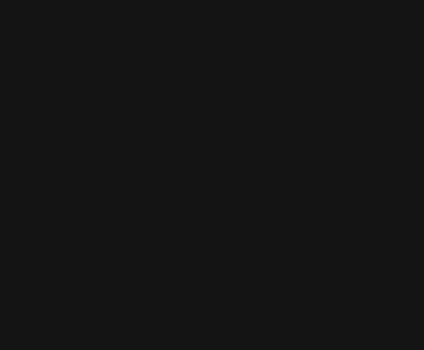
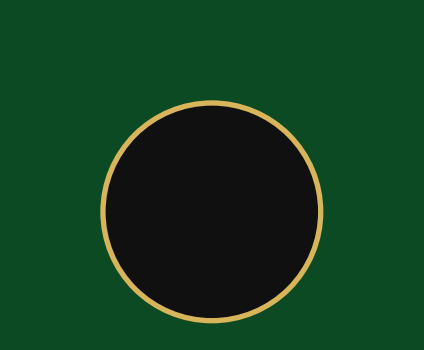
part: none -> (211, 211)

